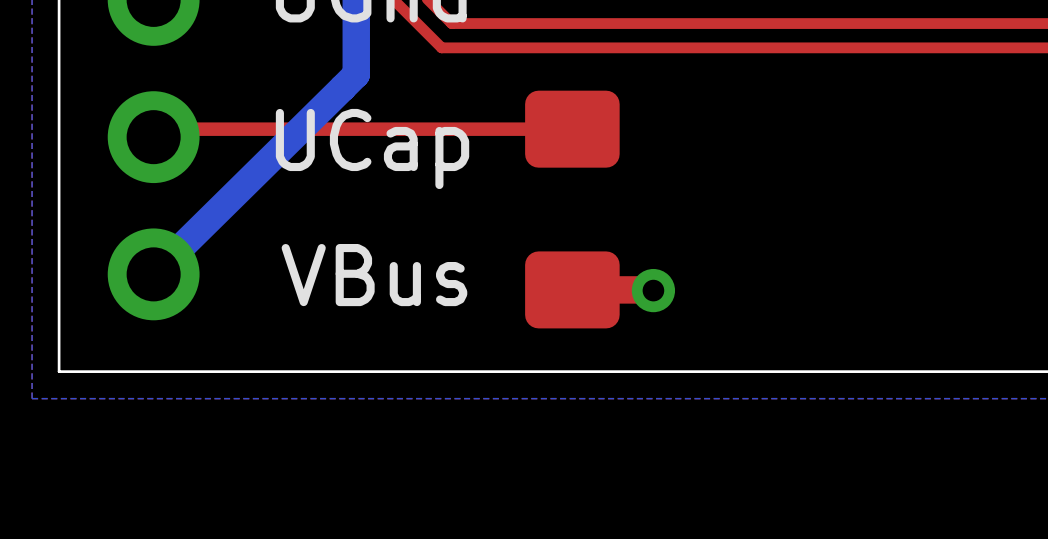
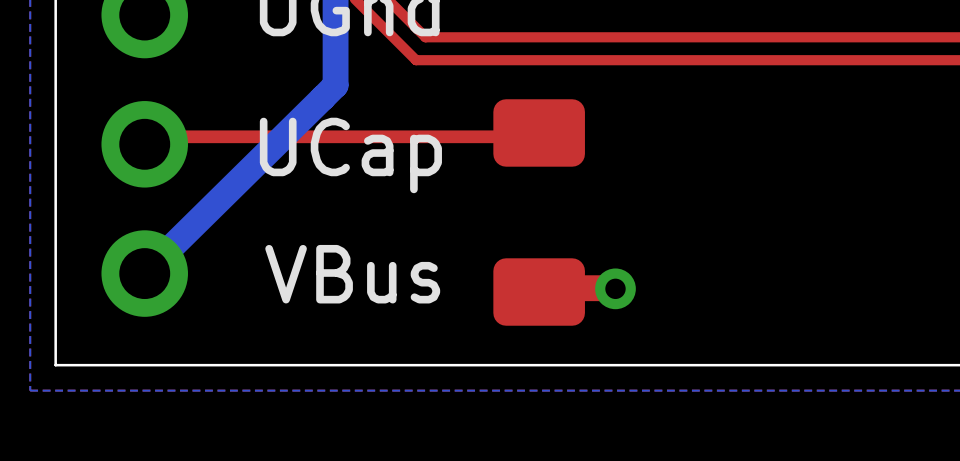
part footprint: [525, 90, 620, 329] -> [493, 99, 585, 326]

